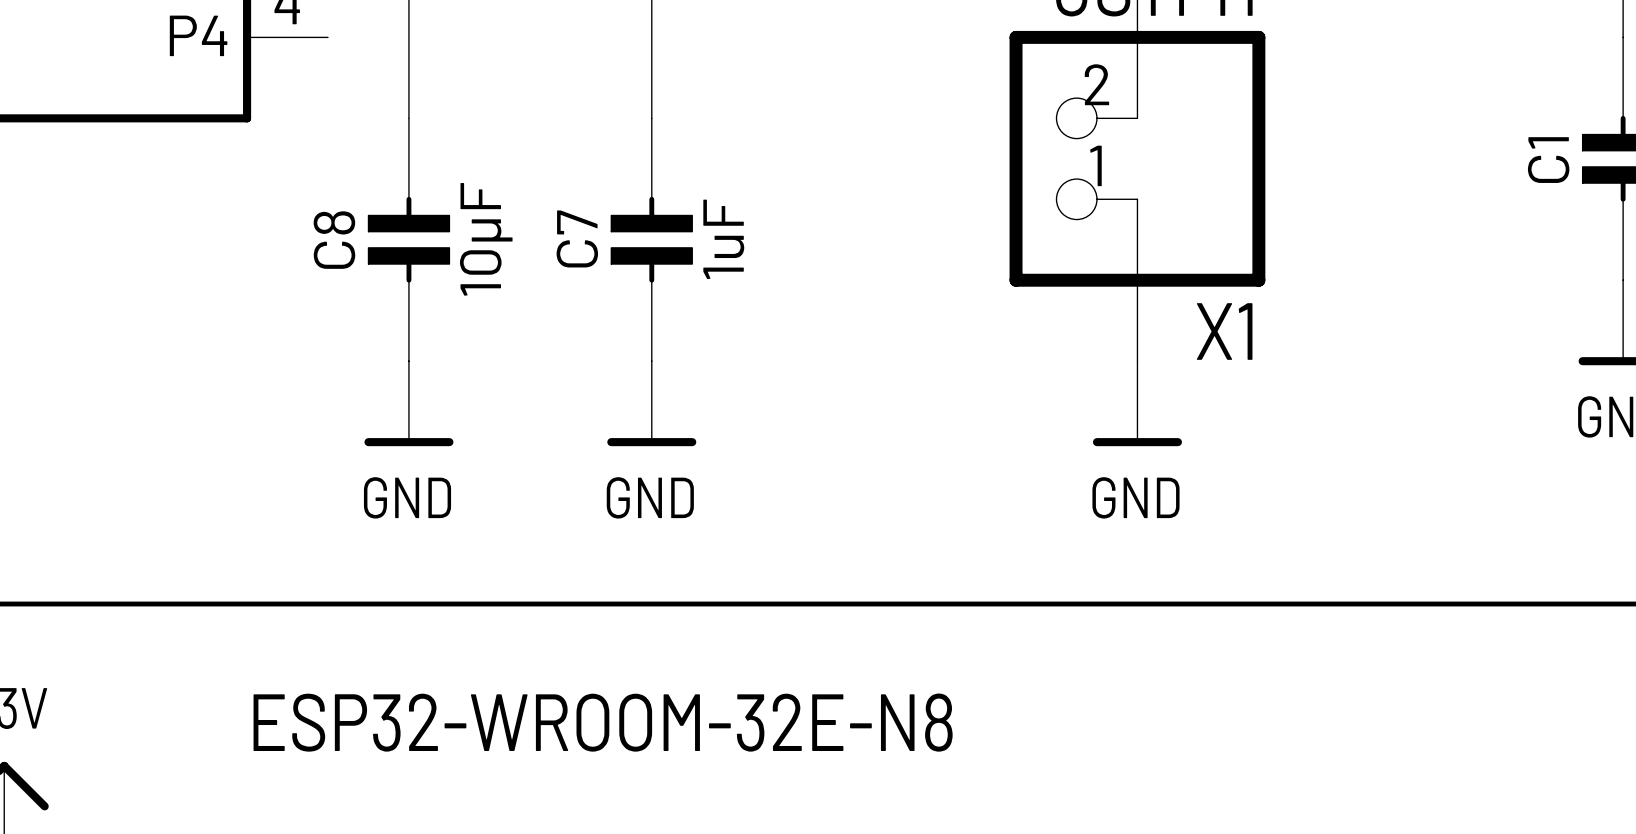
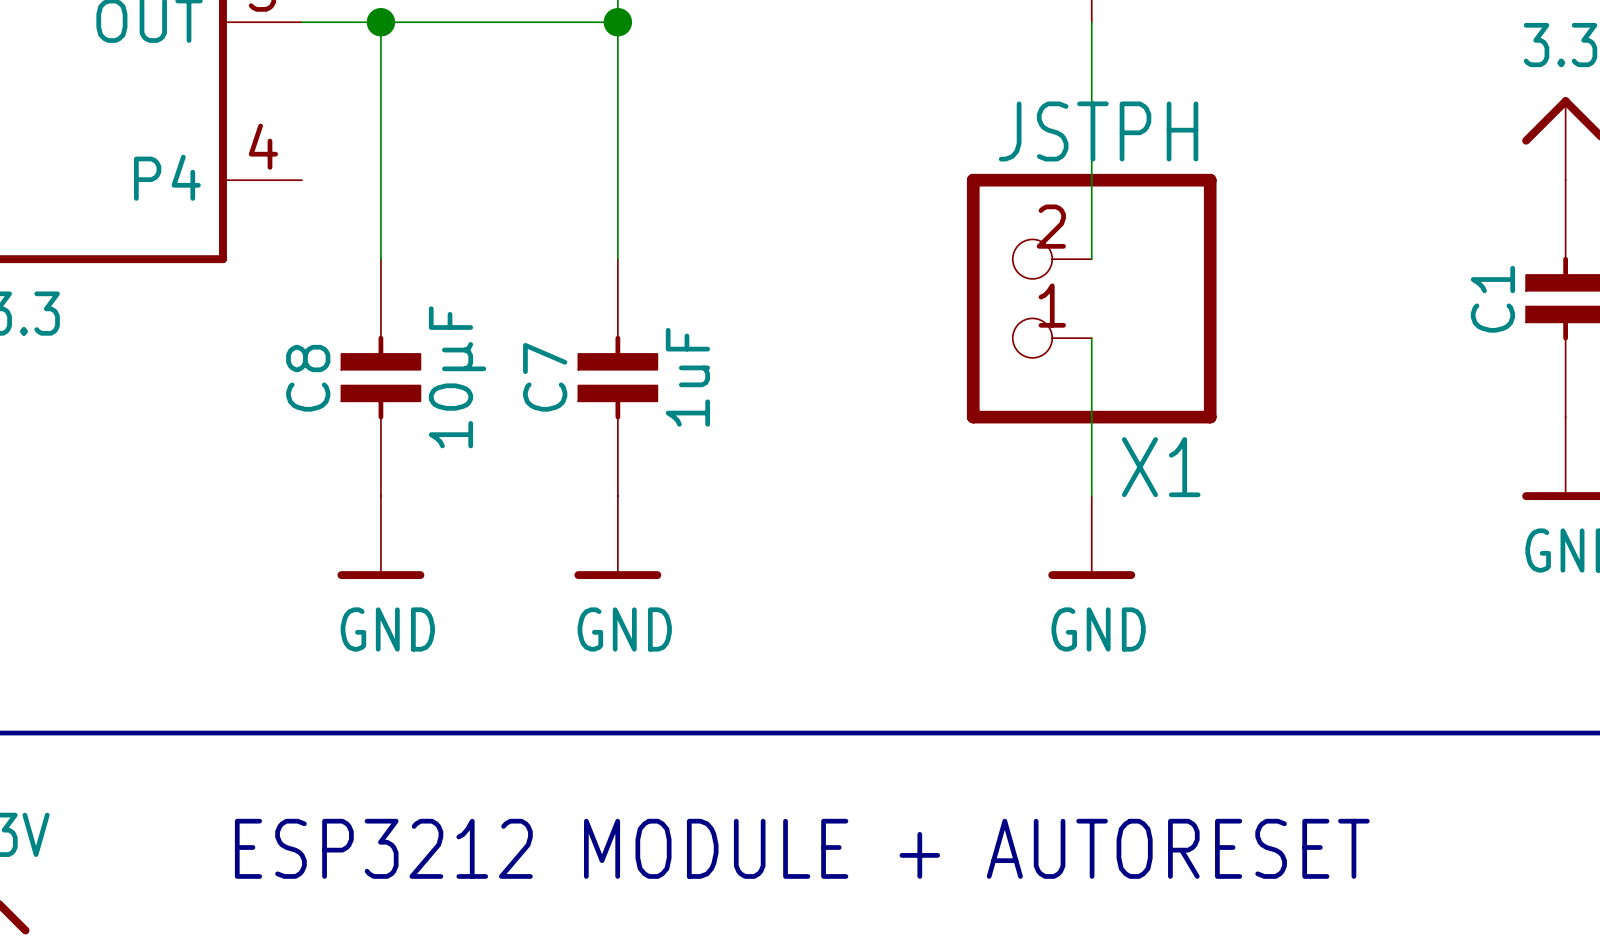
text: ESP32-WROOM-32E-N8 (603, 722) -> ESP3212 MODULE + AUTORESET (802, 848)

